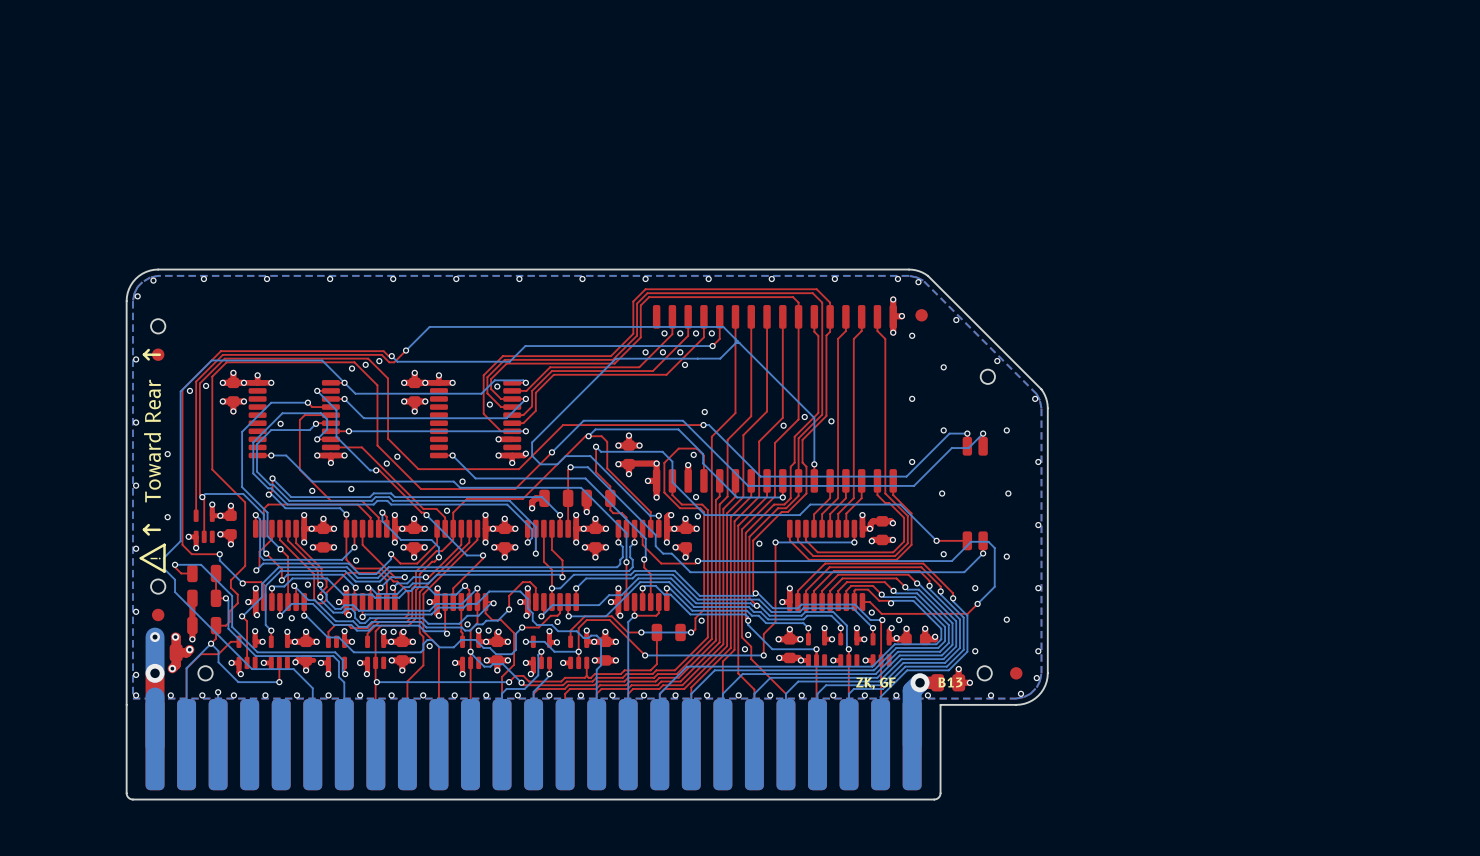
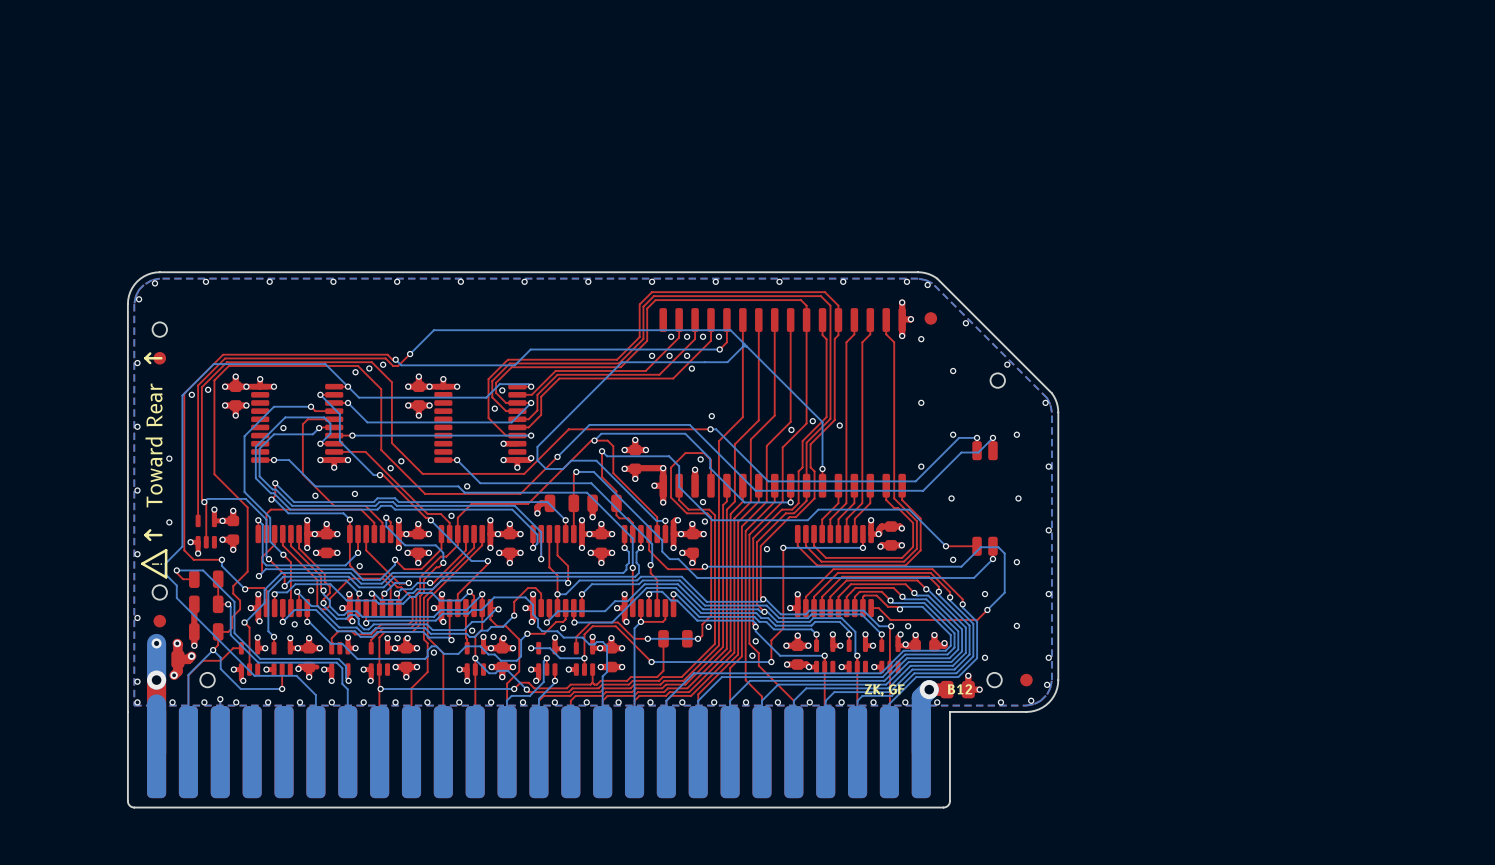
text: B13 (950, 682) -> B12 (960, 689)

